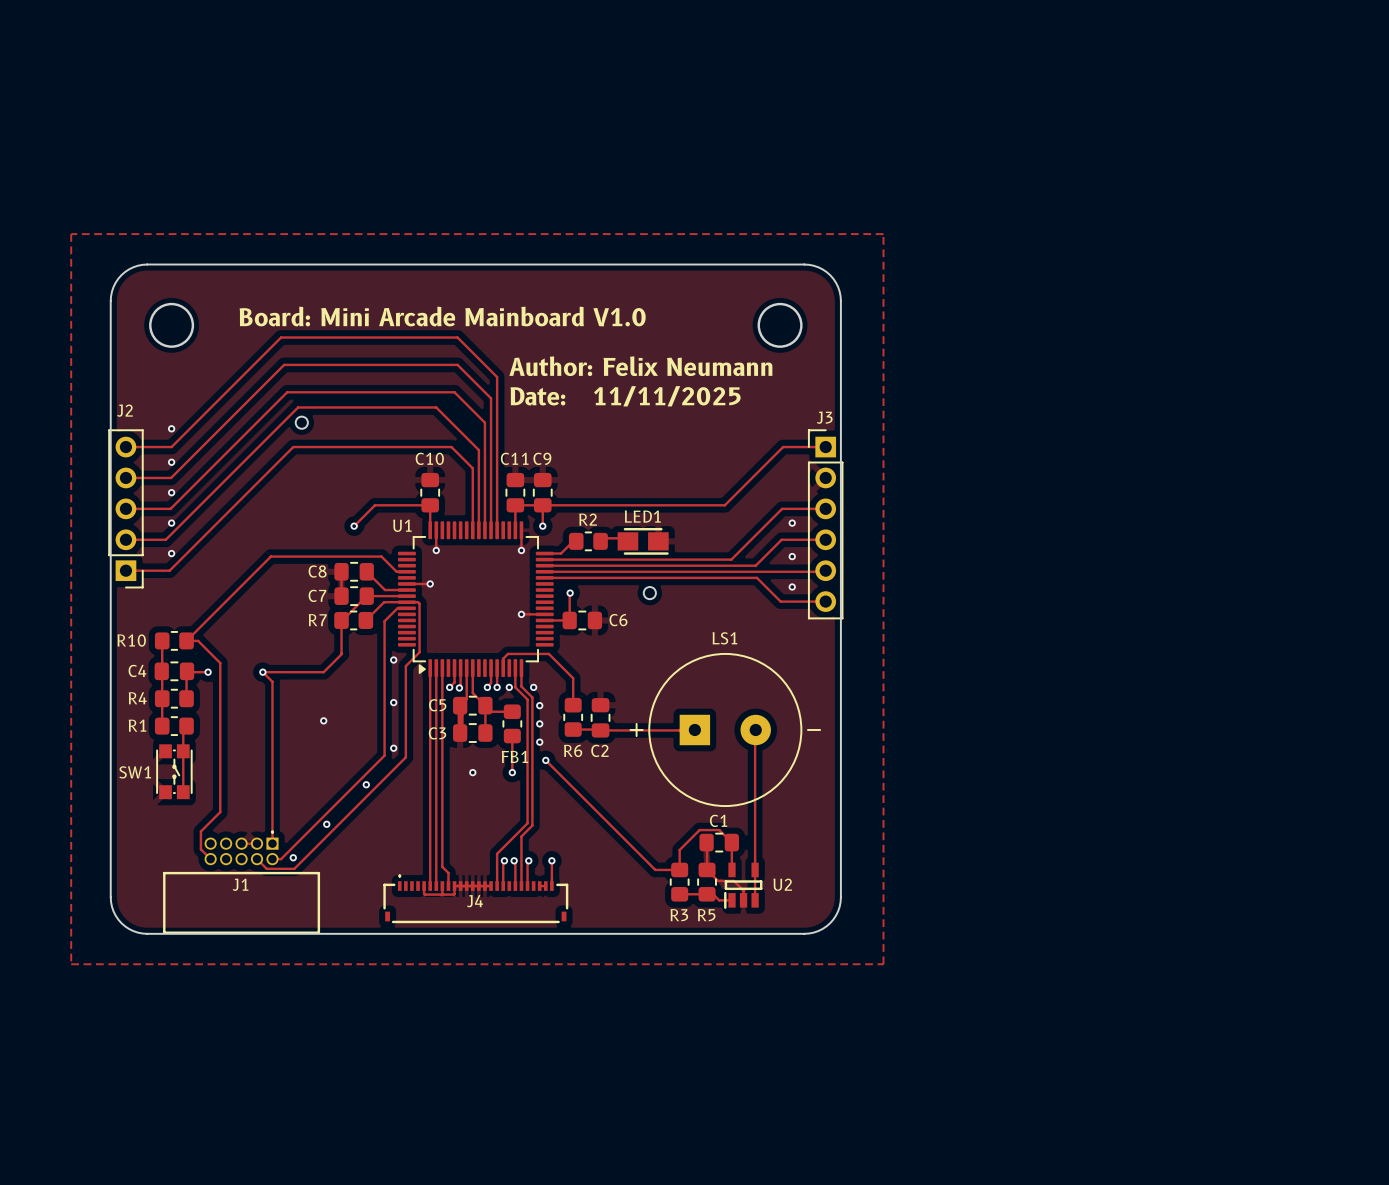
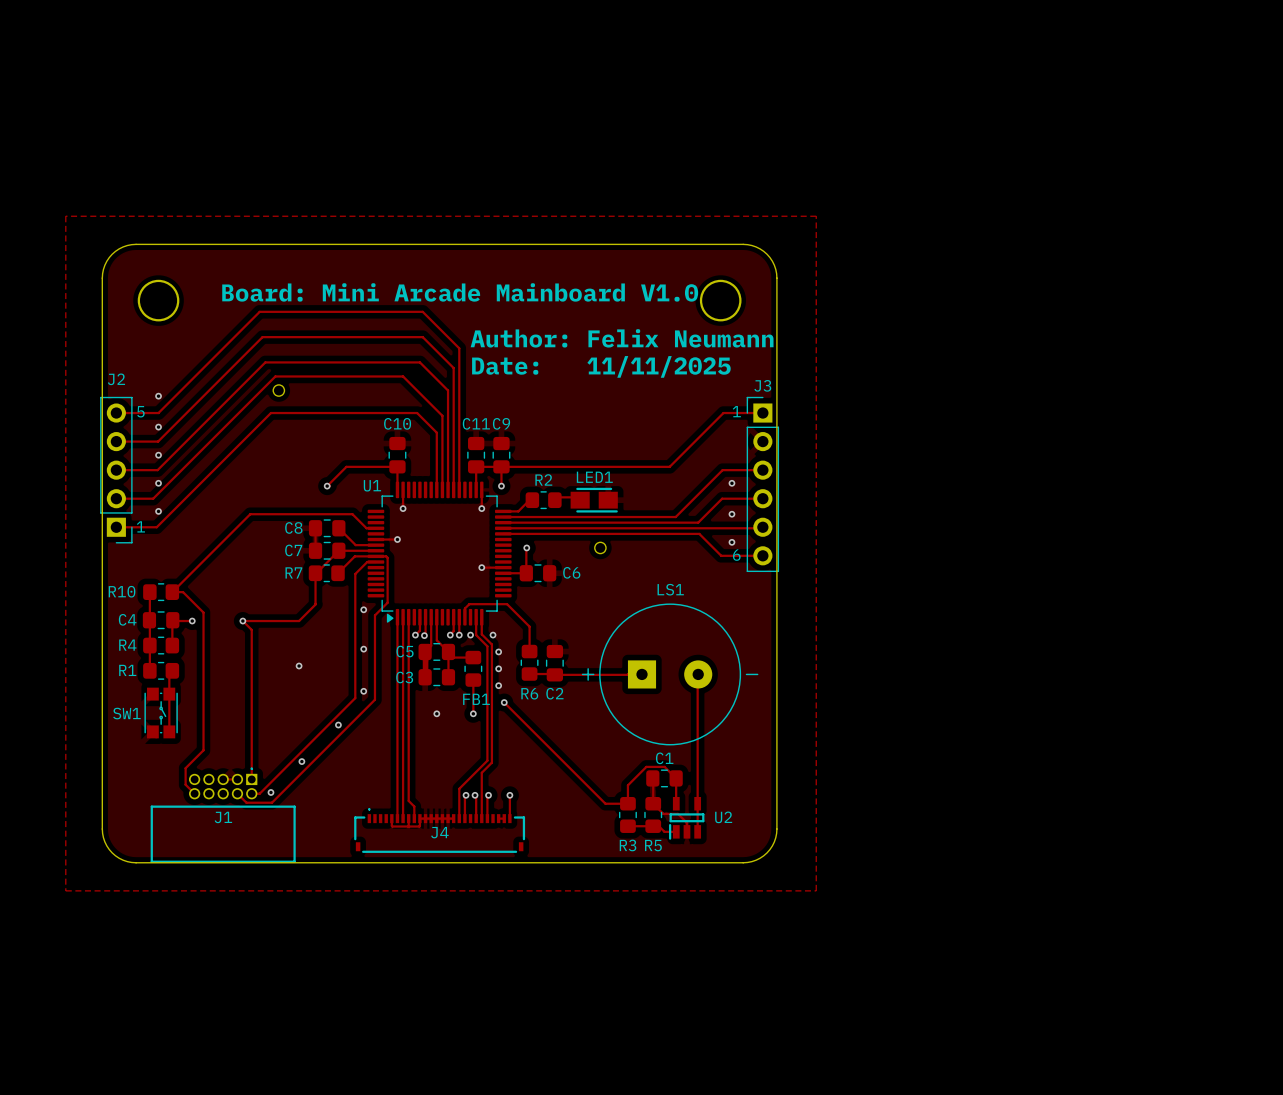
text: none -> 5 (140, 411)
text: none -> 1 (736, 411)
text: none -> 1 (140, 526)
text: none -> 6 (736, 555)

